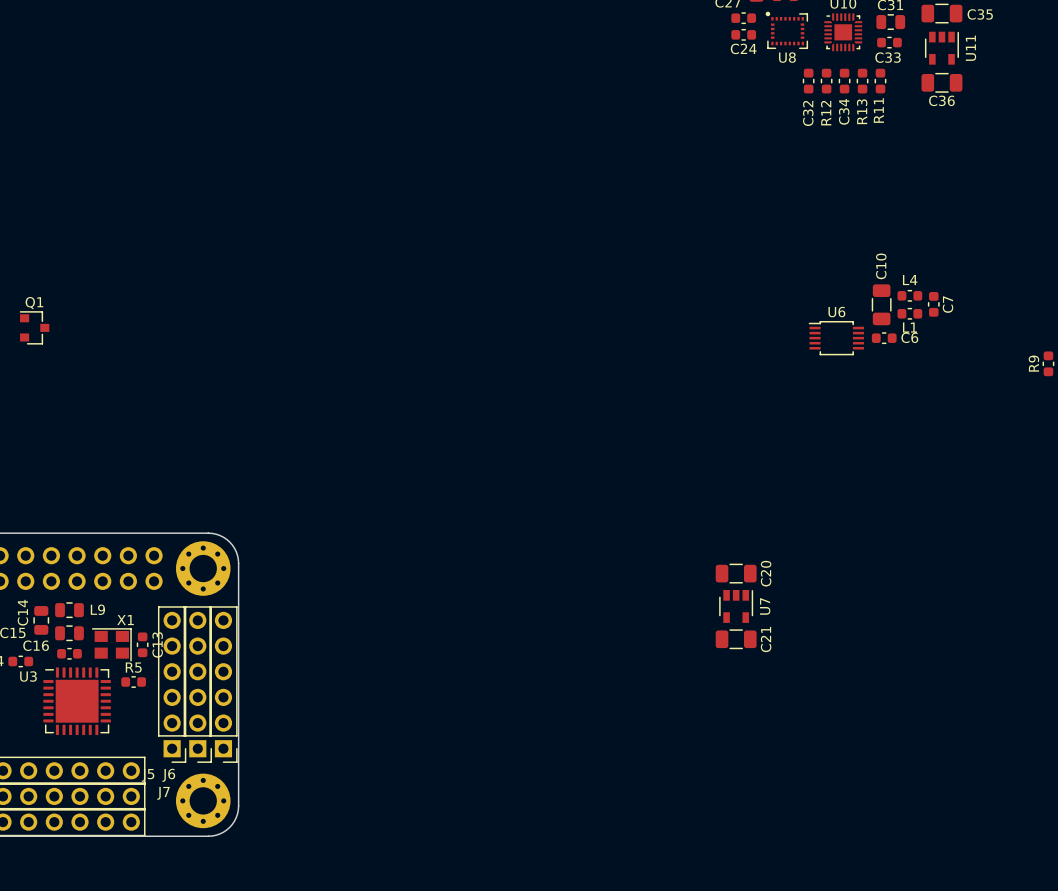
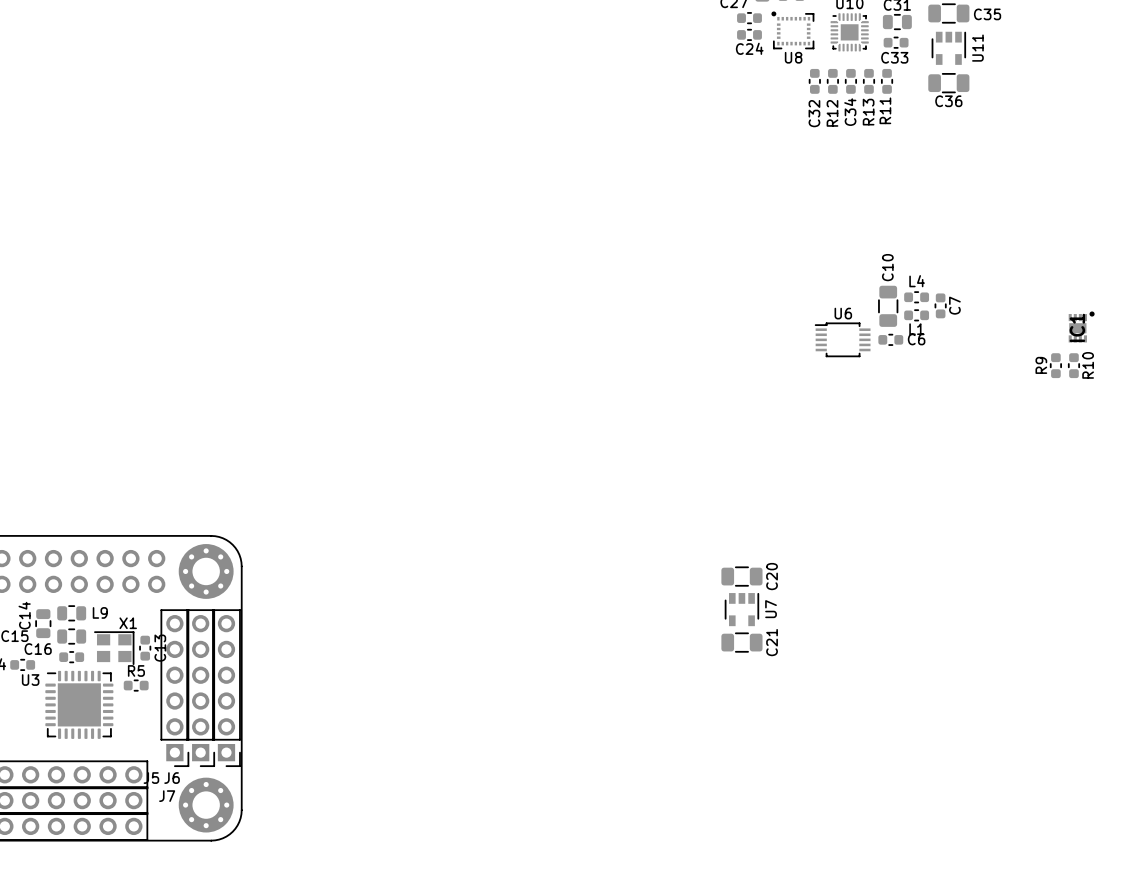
Q1: (34, 327) -> none

